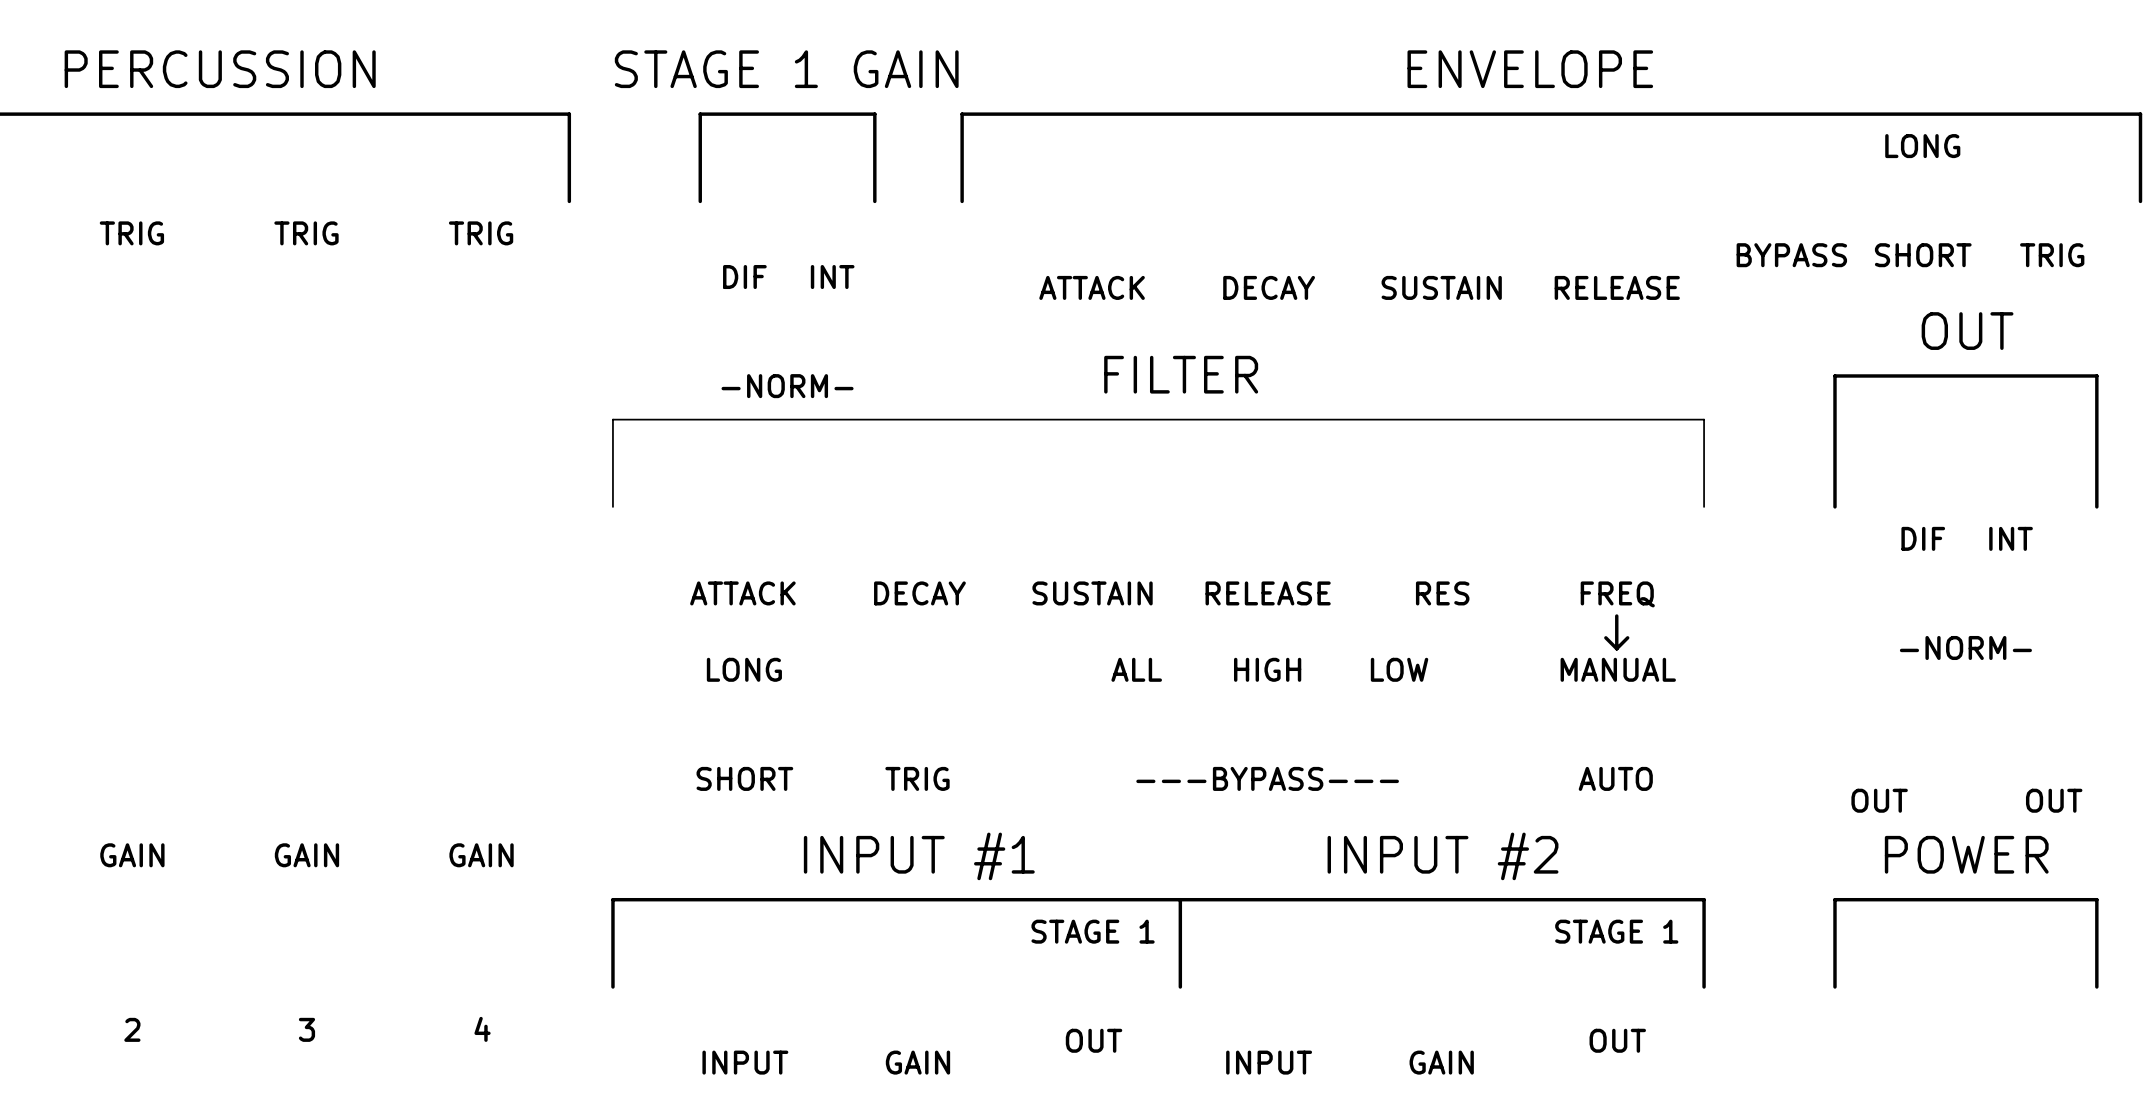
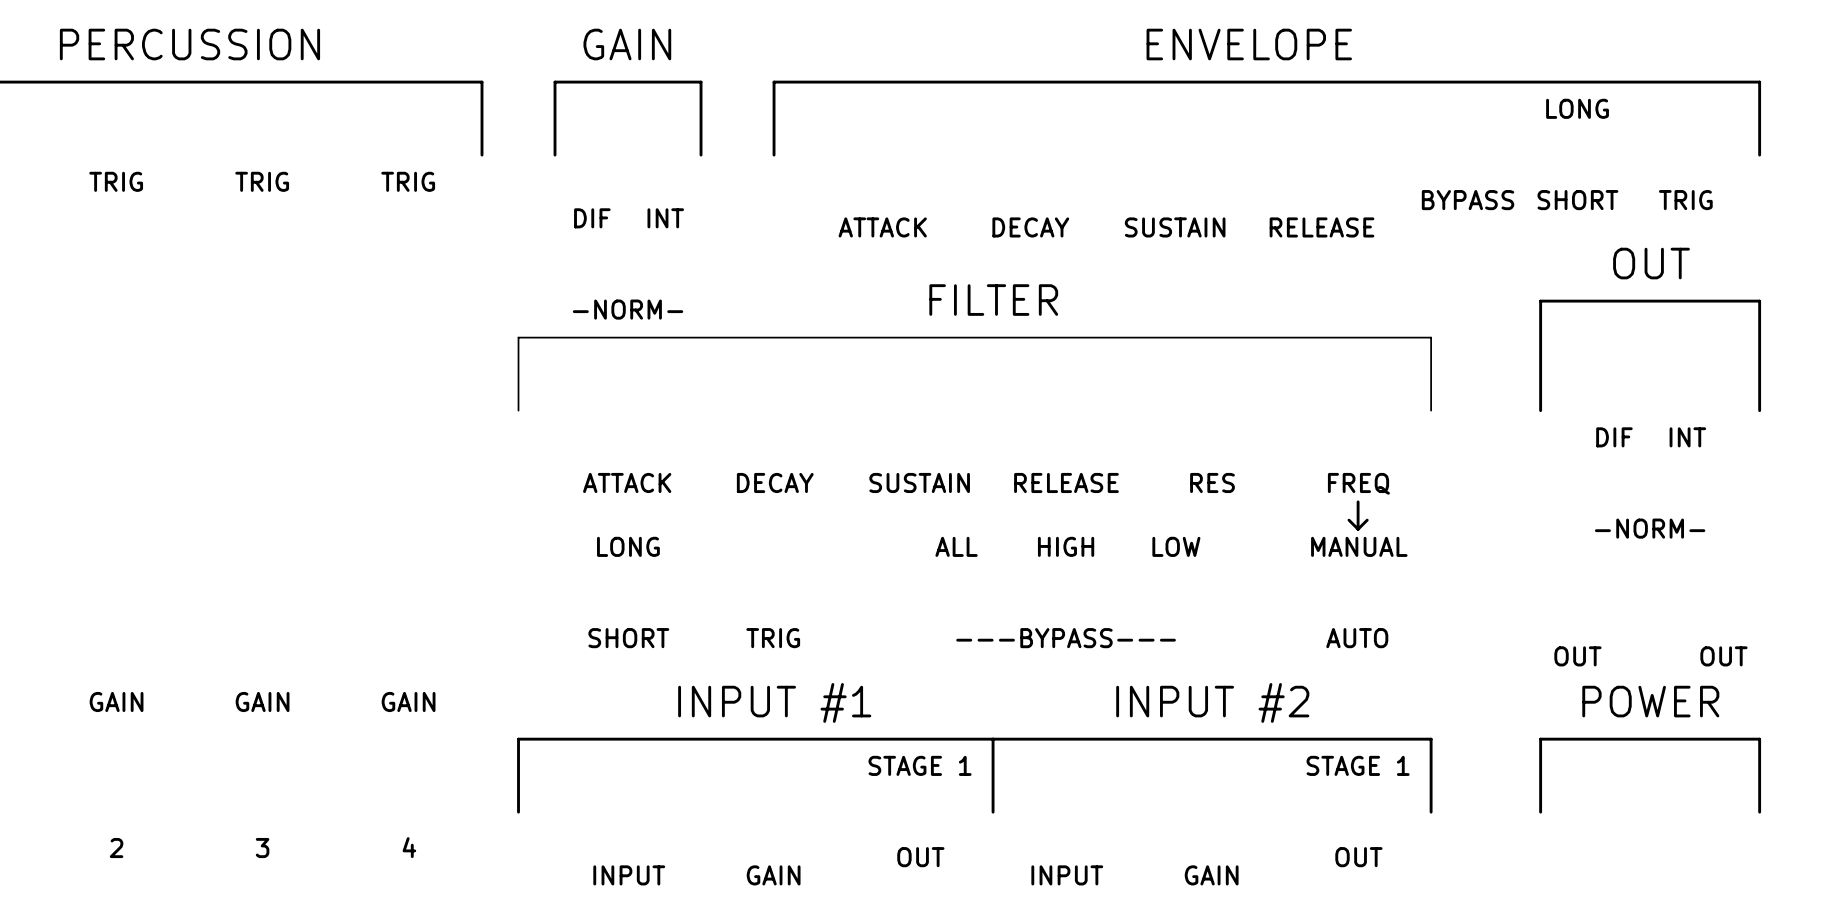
text: none -> GAIN (627, 44)
text: STAGE 1 GAIN (786, 69) -> none
text position: ENVELOPE (1530, 69) -> ENVELOPE (1249, 44)
line: (700, 114) (700, 201) -> (591, 82) (555, 82) (555, 155)
line: (831, 114) (874, 114) (874, 201) -> (701, 82) (701, 155)
line: (962, 114) (962, 201) -> (810, 82) (774, 82) (774, 155)
line: (2096, 114) (2140, 114) (2140, 201) -> (1759, 82) (1759, 155)
text position: LONG (1922, 146) -> LONG (1577, 108)
text position: BYPASS (1791, 255) -> BYPASS (1468, 200)
text position: SHORT (1923, 255) -> SHORT (1577, 200)
text position: TRIG (2052, 255) -> TRIG (1685, 200)
text position: DIF (744, 277) -> DIF (592, 218)
text position: INT (832, 277) -> INT (665, 218)
text position: ATTACK (1092, 287) -> ATTACK (882, 227)
text position: DECAY (1269, 287) -> DECAY (1030, 227)
text position: SUSTAIN (1441, 287) -> SUSTAIN (1175, 227)
text position: RELEASE (1617, 287) -> RELEASE (1322, 227)
text position: -NORM- (787, 386) -> -NORM- (628, 309)

